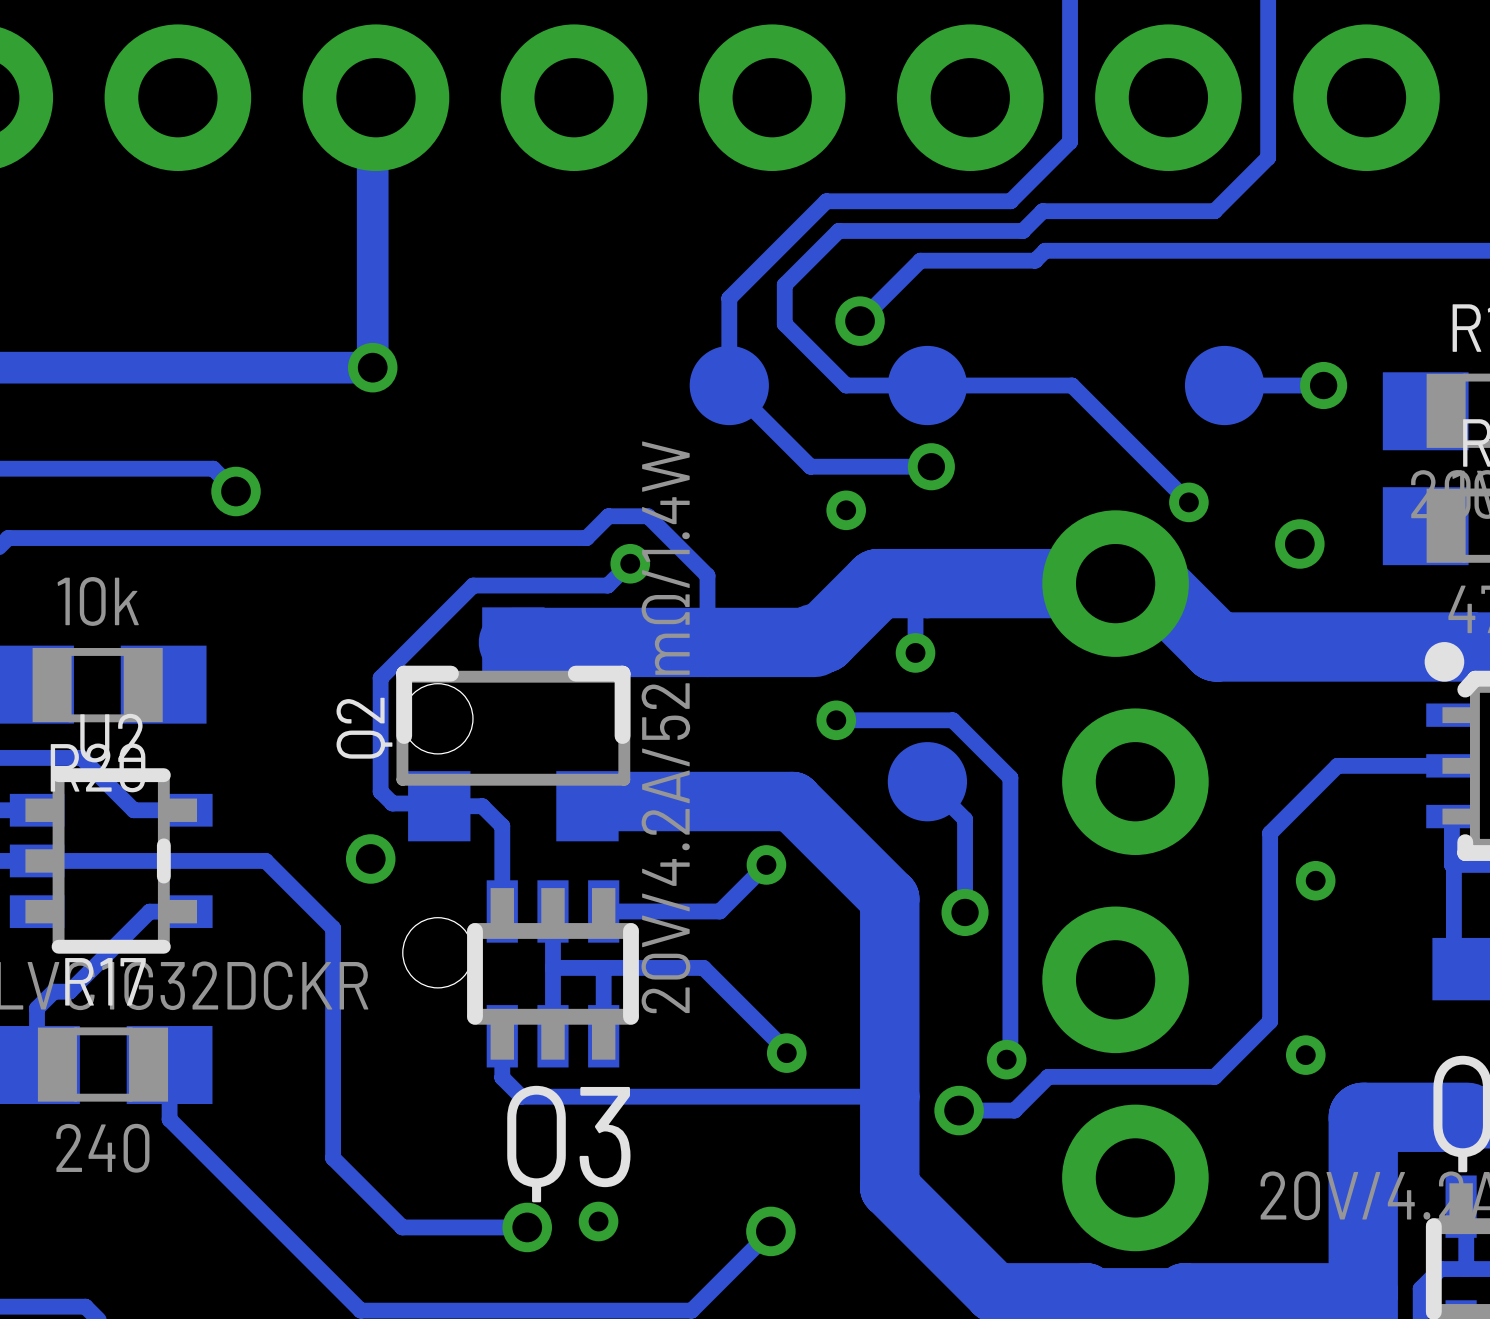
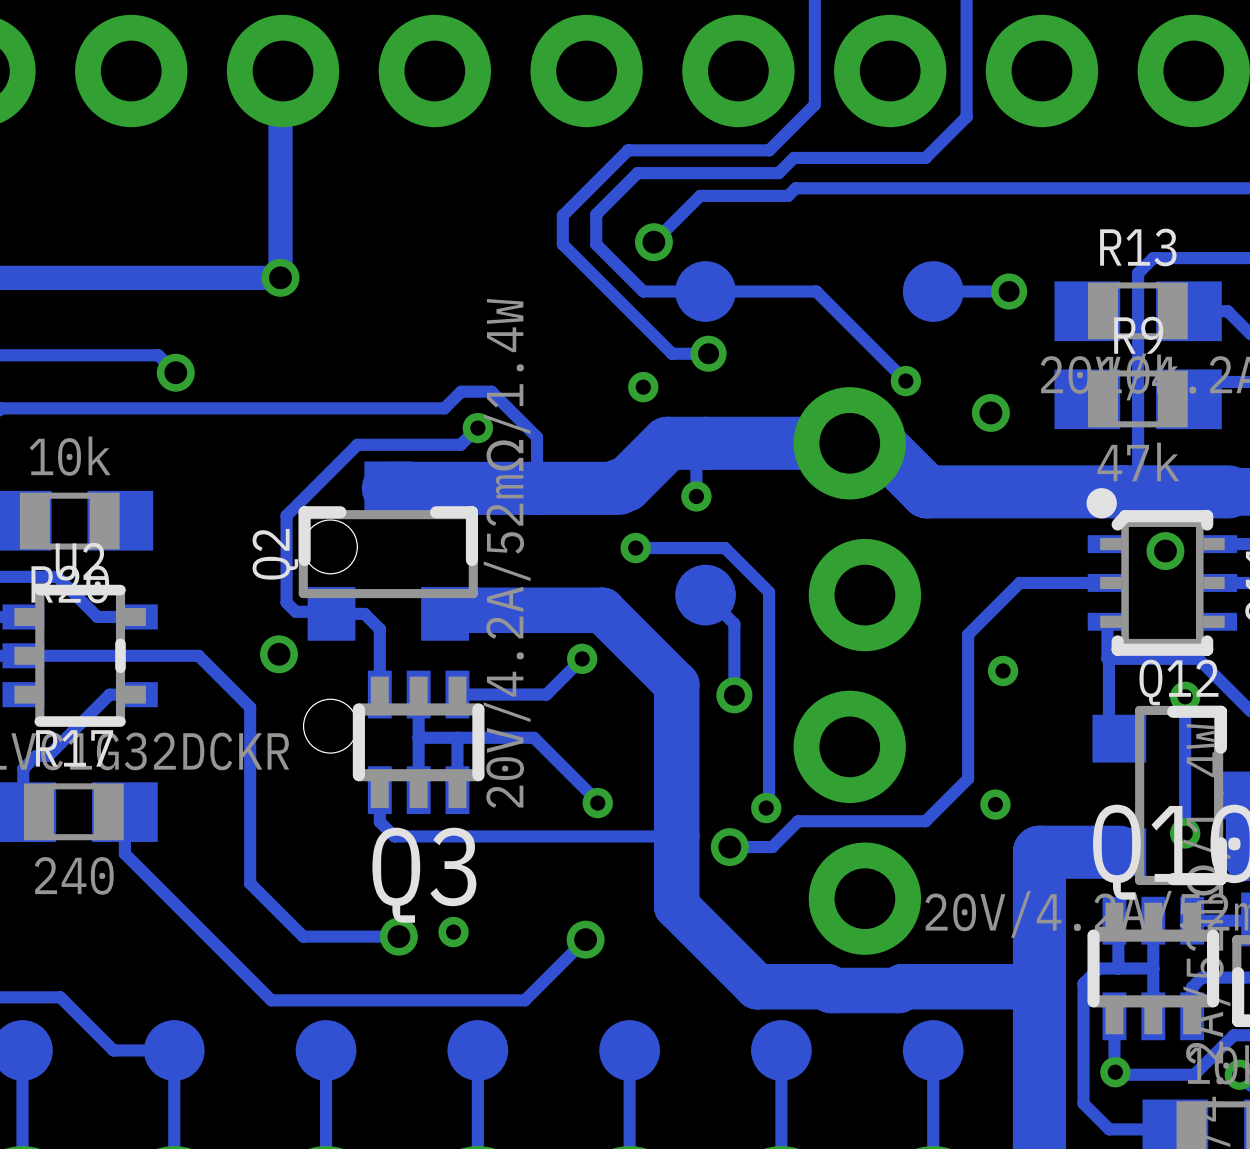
track: (741, 286) (729, 298) (729, 385) (810, 466) (883, 466) -> (562, 215) (562, 244) (672, 353)
part: (729, 385) -> none

